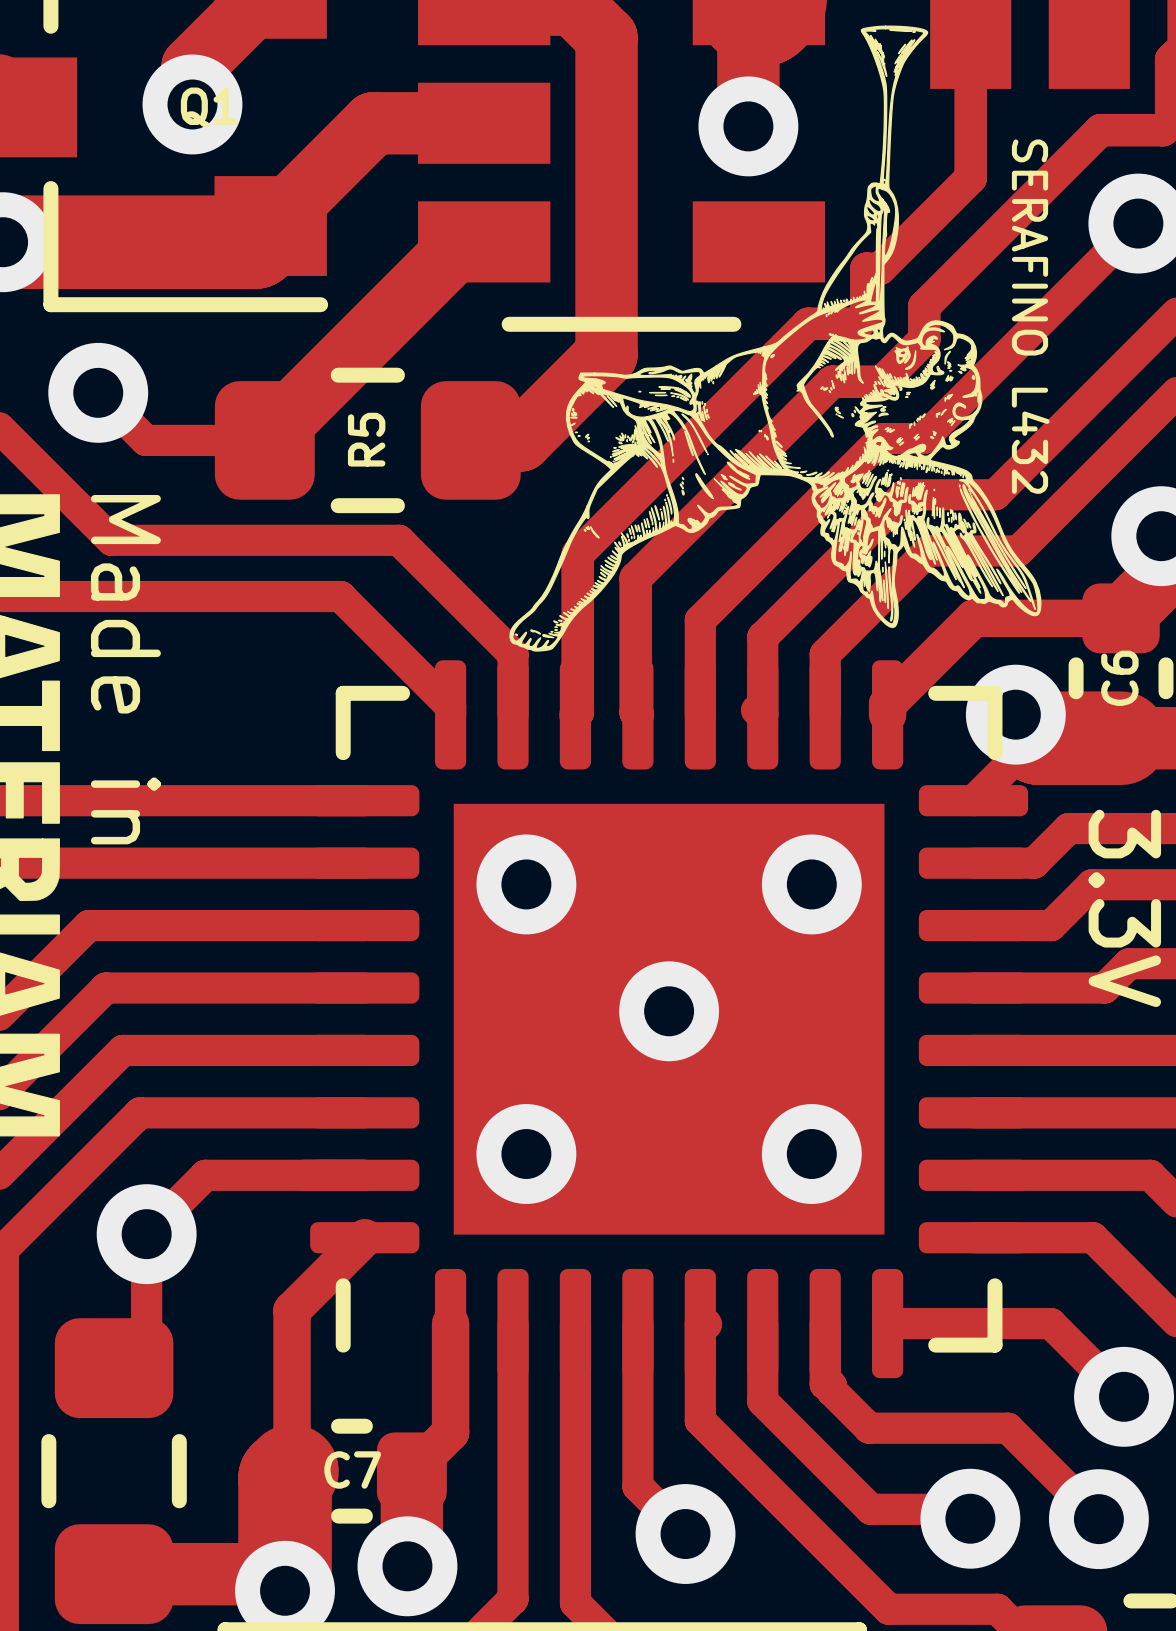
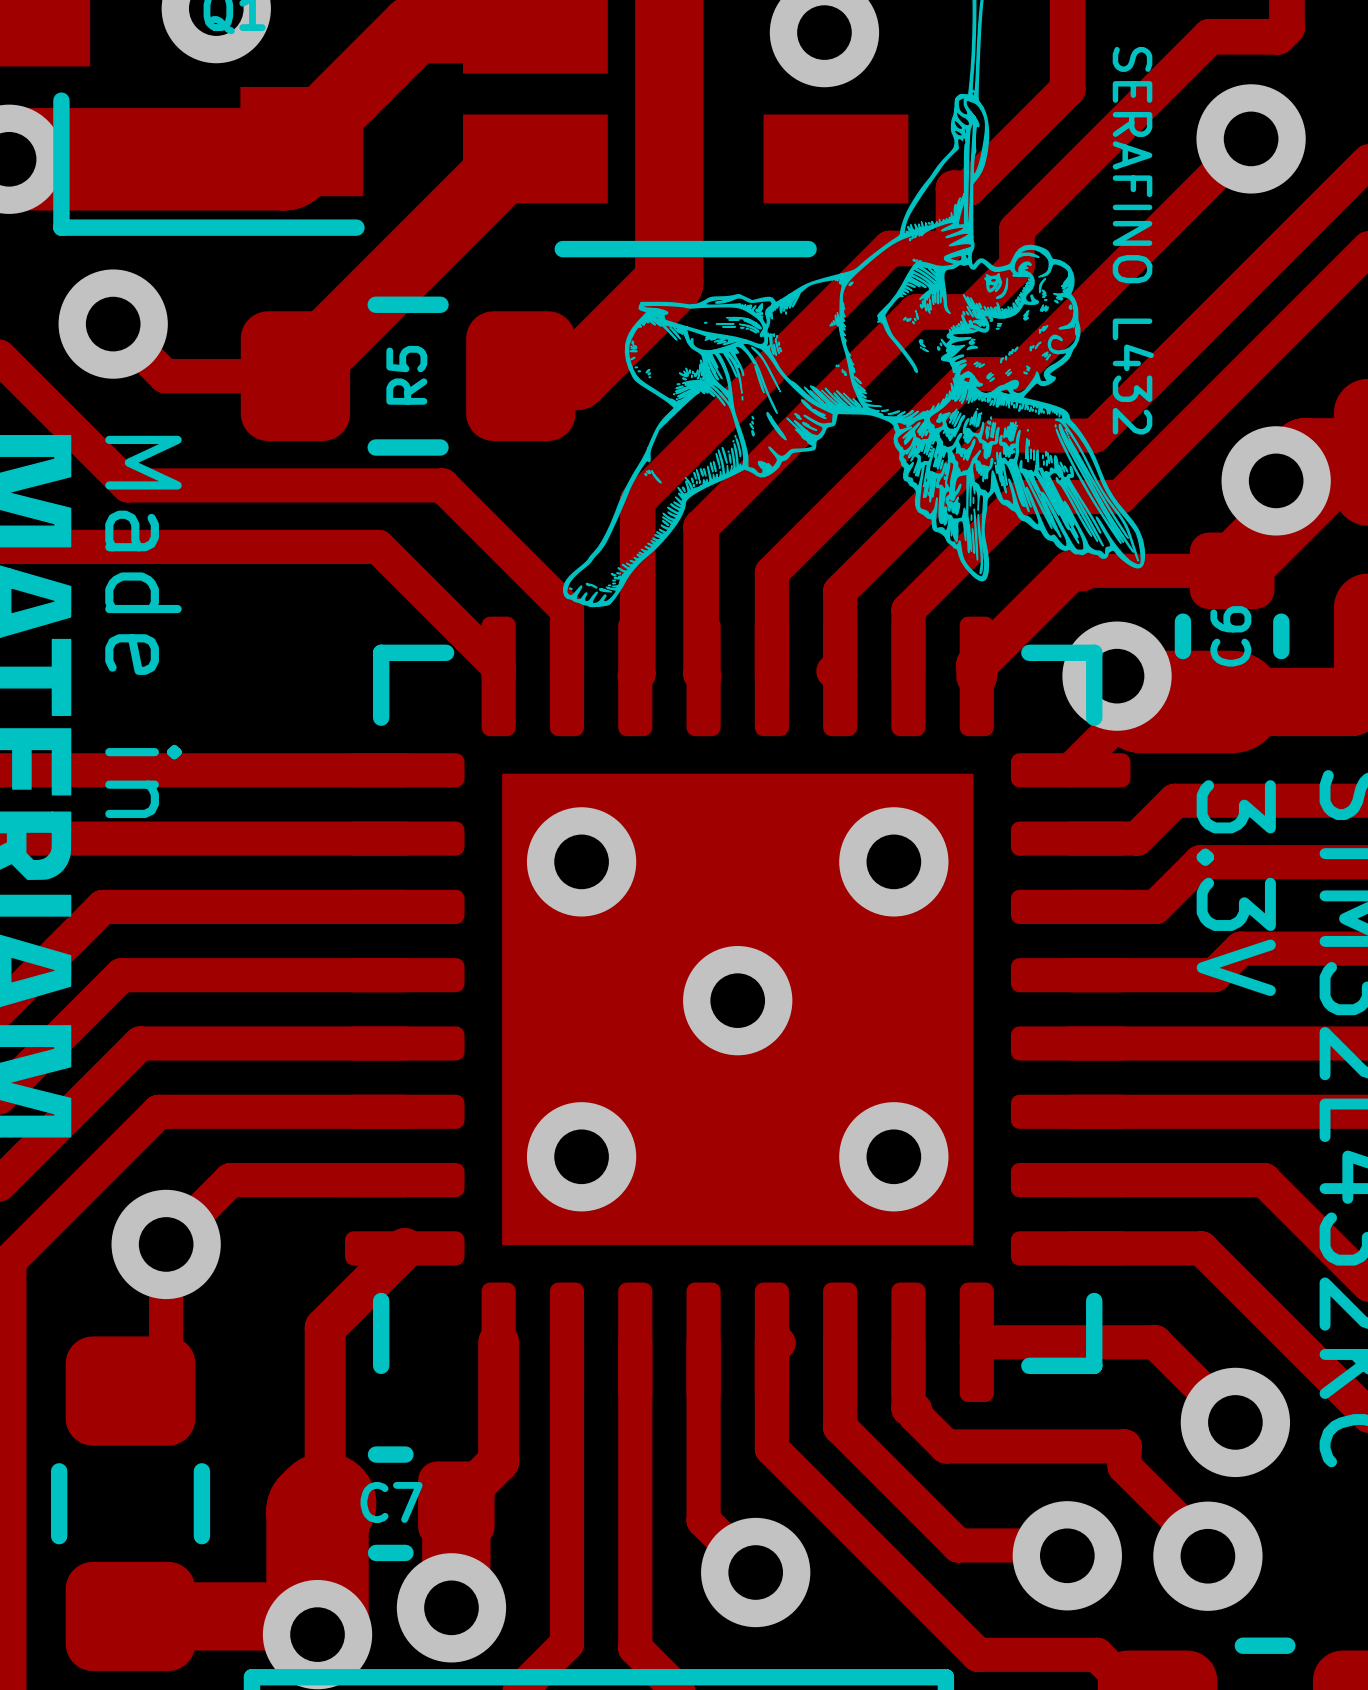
track width: thick (984, 618) (1121, 618) -> thin (1082, 570) (1232, 570)
track: (859, 1418) (869, 1428) (1007, 1428) (1098, 1519) -> (946, 1446) (1124, 1446) (1124, 1466) (1204, 1546)

